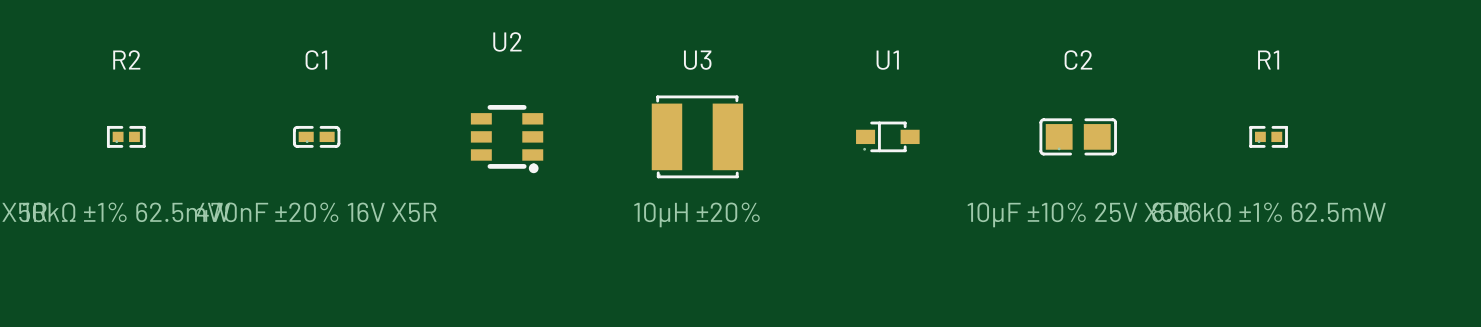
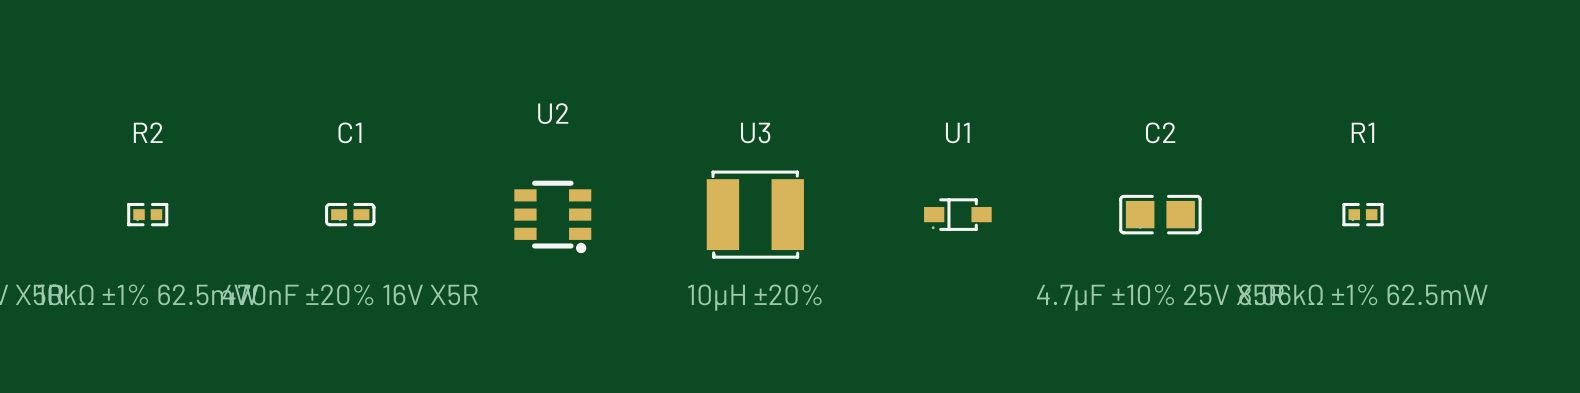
C2 value: 10µF ±10% 25V X5R (1078, 214) -> 4.7µF ±10% 25V X5R (1160, 297)

